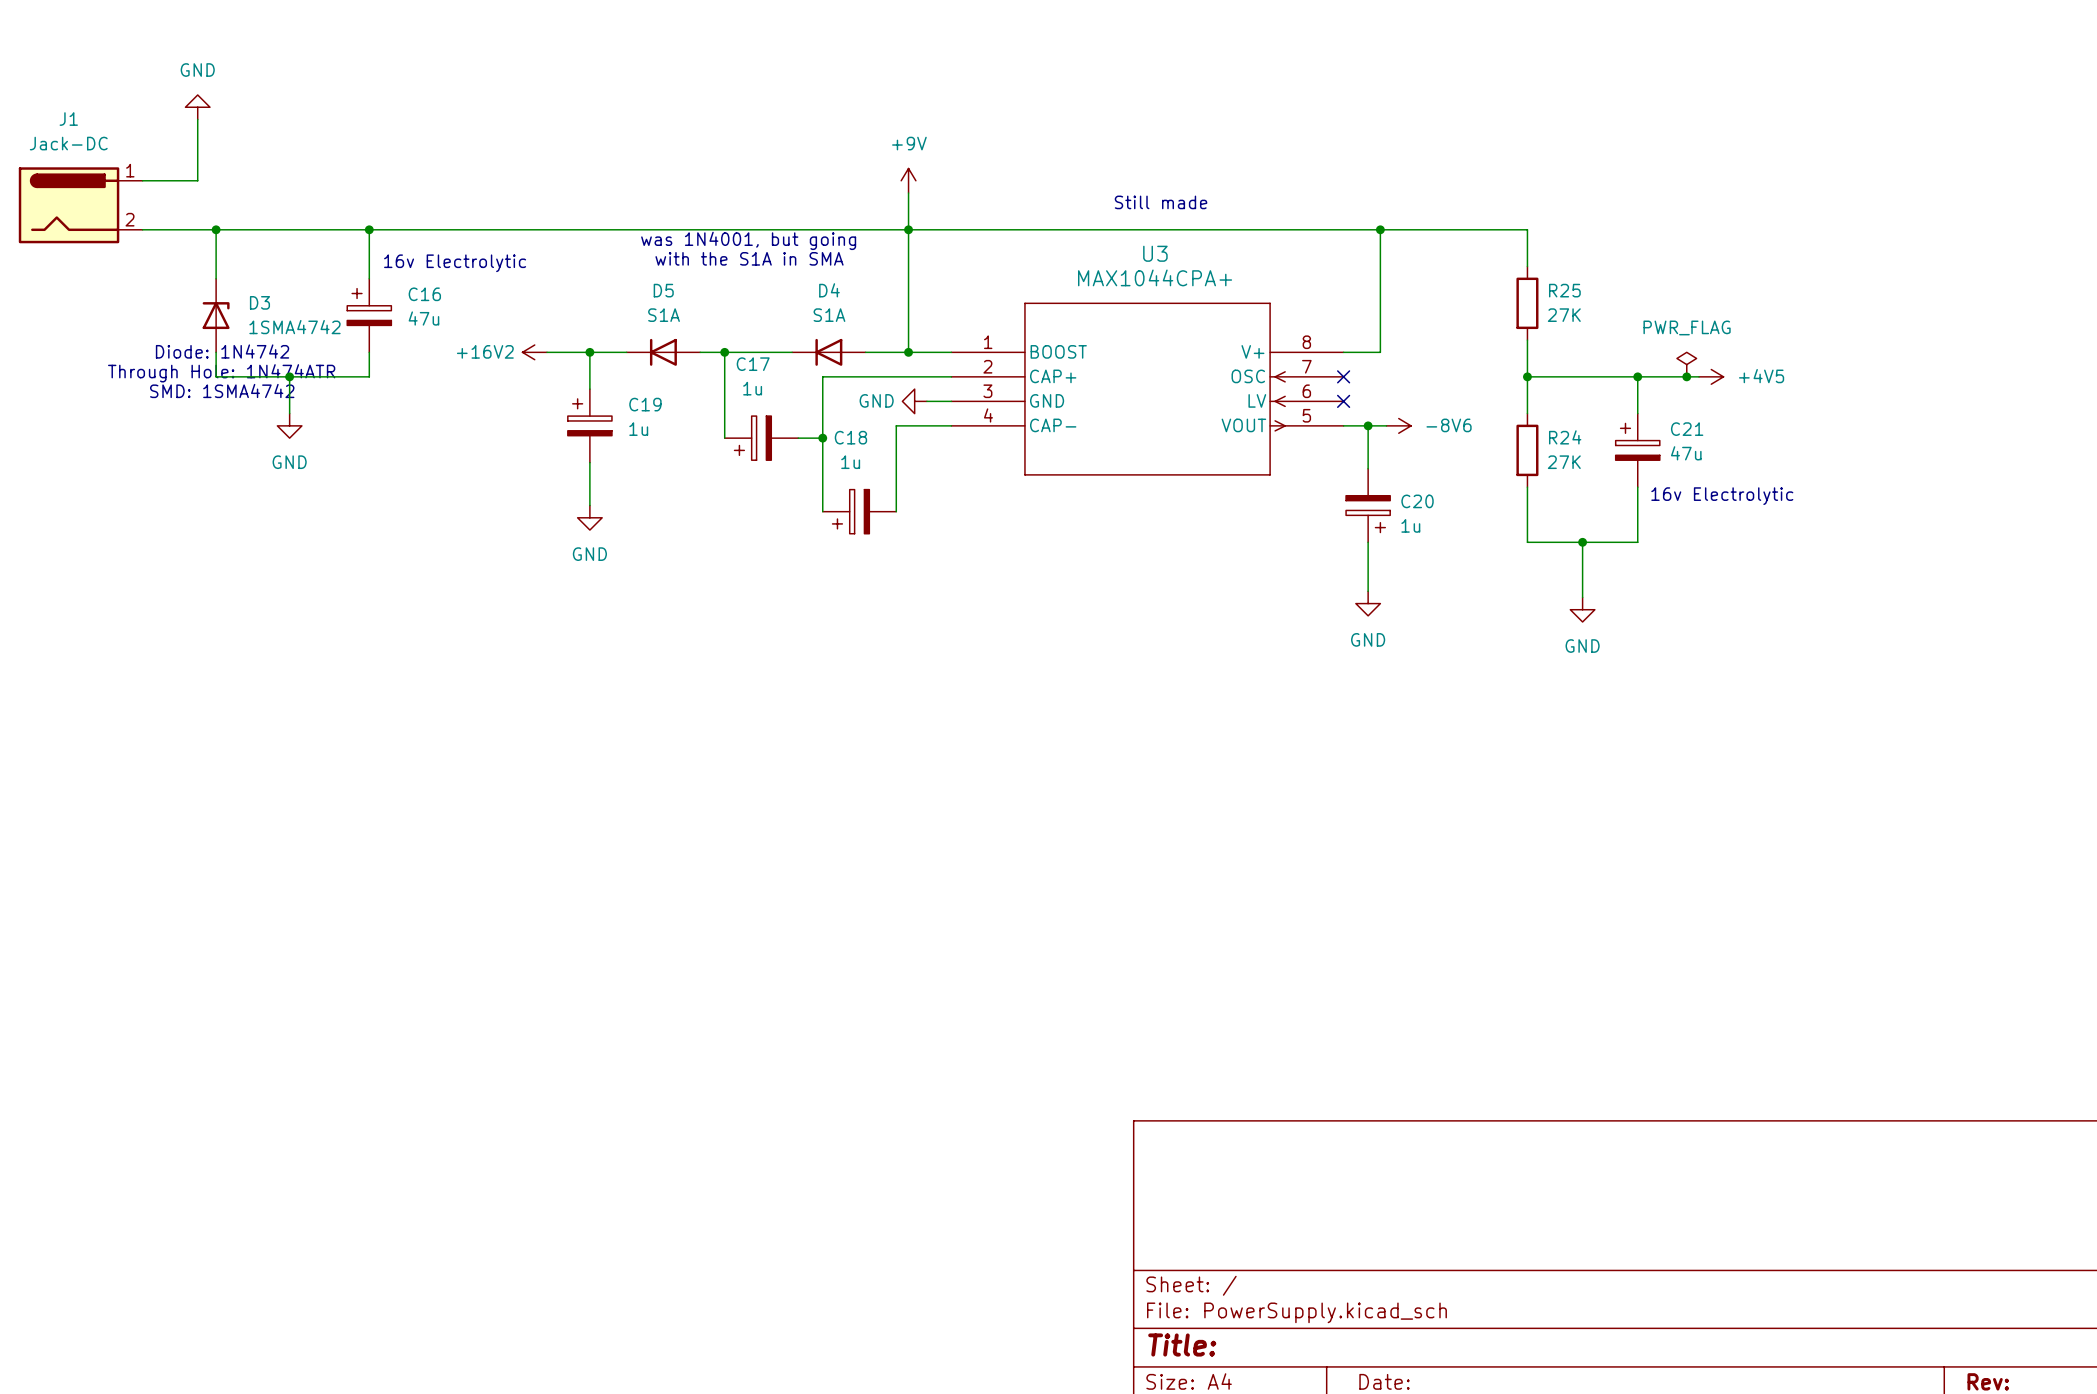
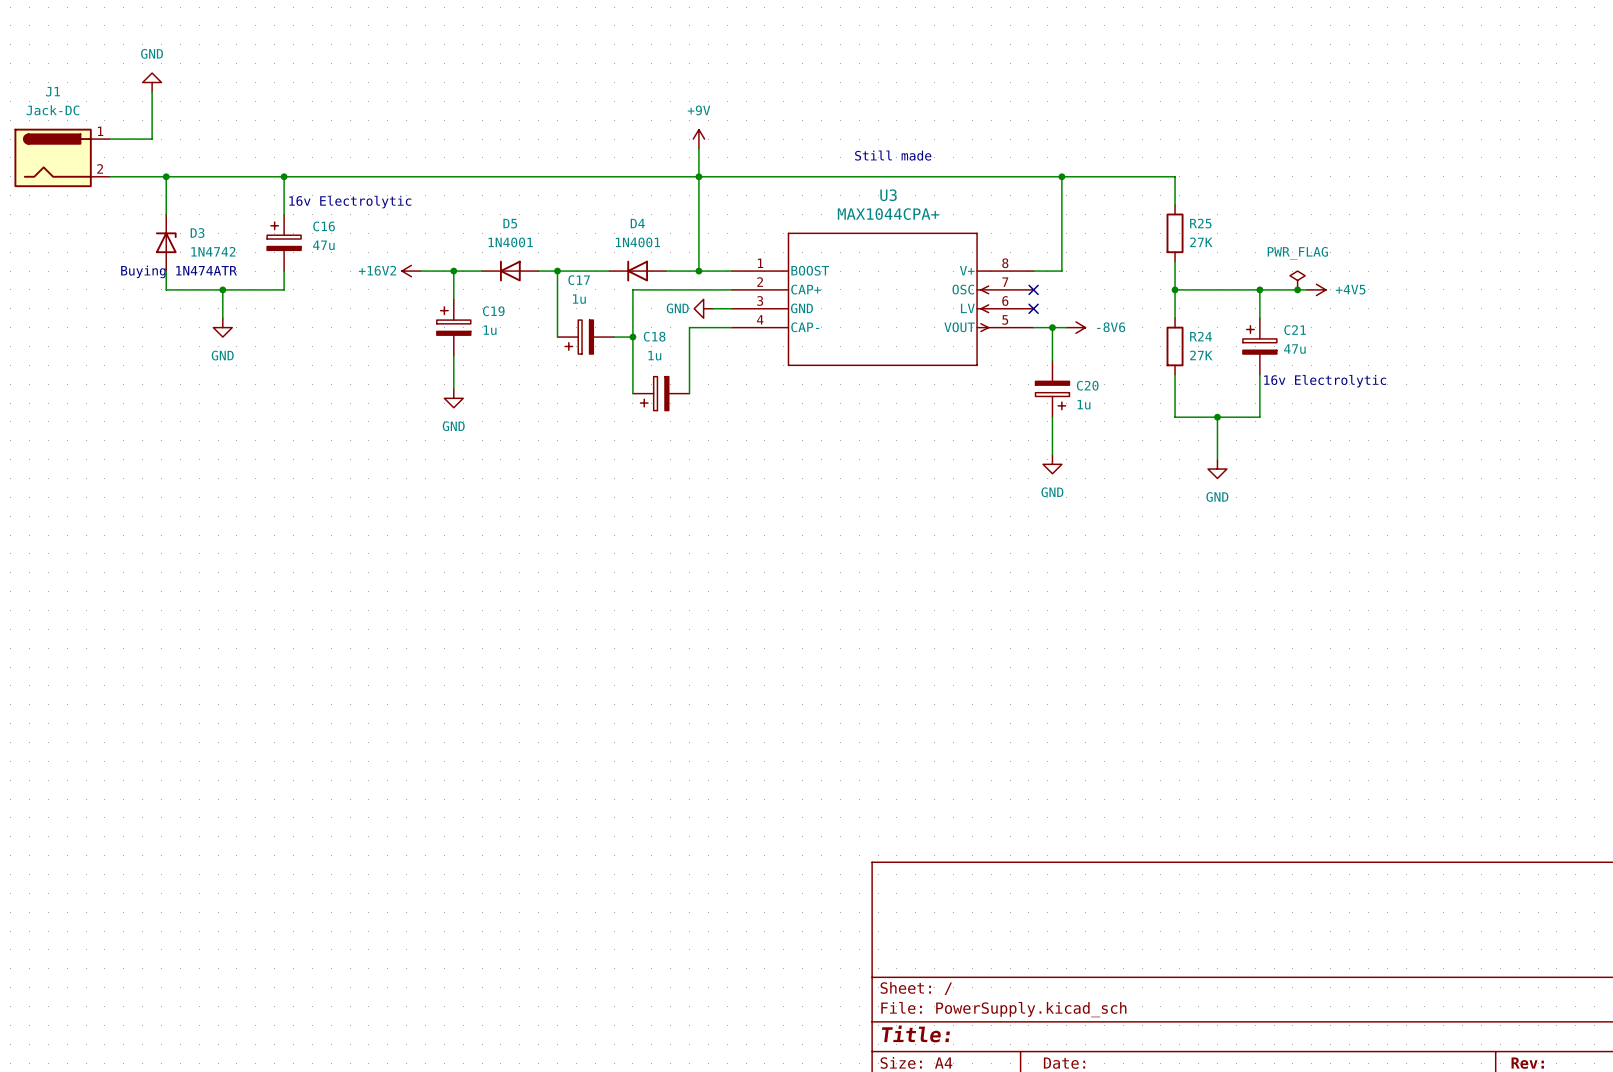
text: was 1N4001, but going (748, 240) -> none
text: with the S1A in SMA (749, 258) -> none
D5 value: S1A (664, 315) -> 1N4001 (510, 242)
D4 value: S1A (829, 315) -> 1N4001 (637, 242)
D3 value: 1SMA4742 (294, 327) -> 1N4742 (213, 251)
text: Diode: 1N4742 (222, 351) -> none
text: none -> Buying 1N474ATR (179, 271)
text: Through Hole: 1N474ATR (221, 373) -> none
text: SMD: 1SMA4742 (222, 390) -> none

